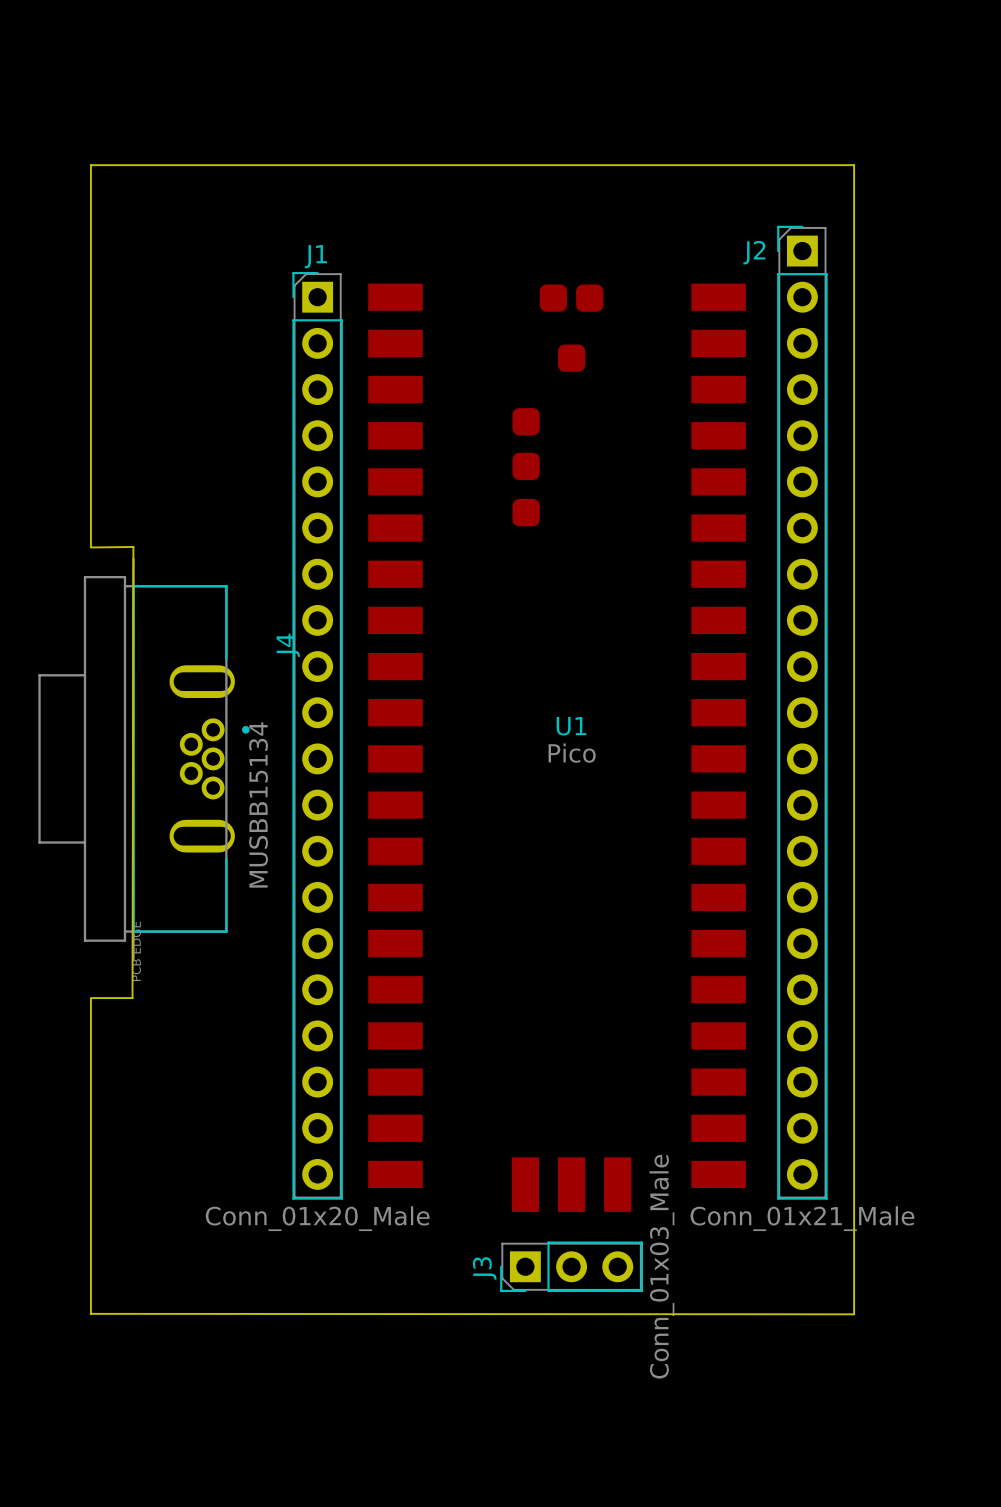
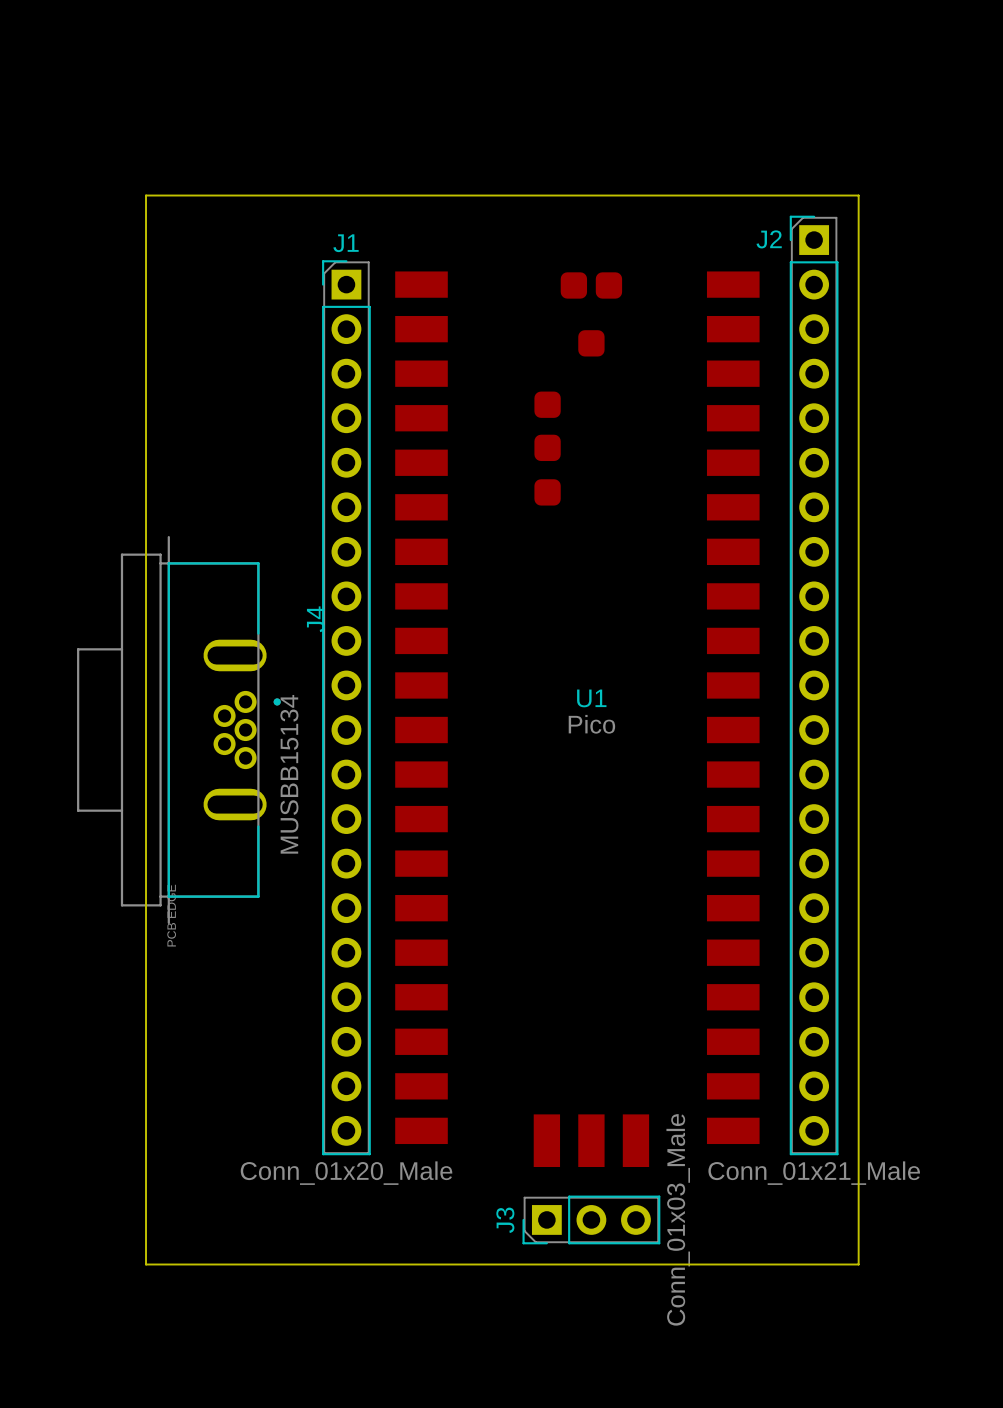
board edge: none -> (146, 195) (858, 195) (858, 1264) (146, 1264) (146, 195)
board edge: (90, 547) (90, 165) (854, 165) (854, 1314) (90, 1313) (90, 998) -> none
board edge: (91, 547) (133, 546) (132, 998) (90, 998) -> none

